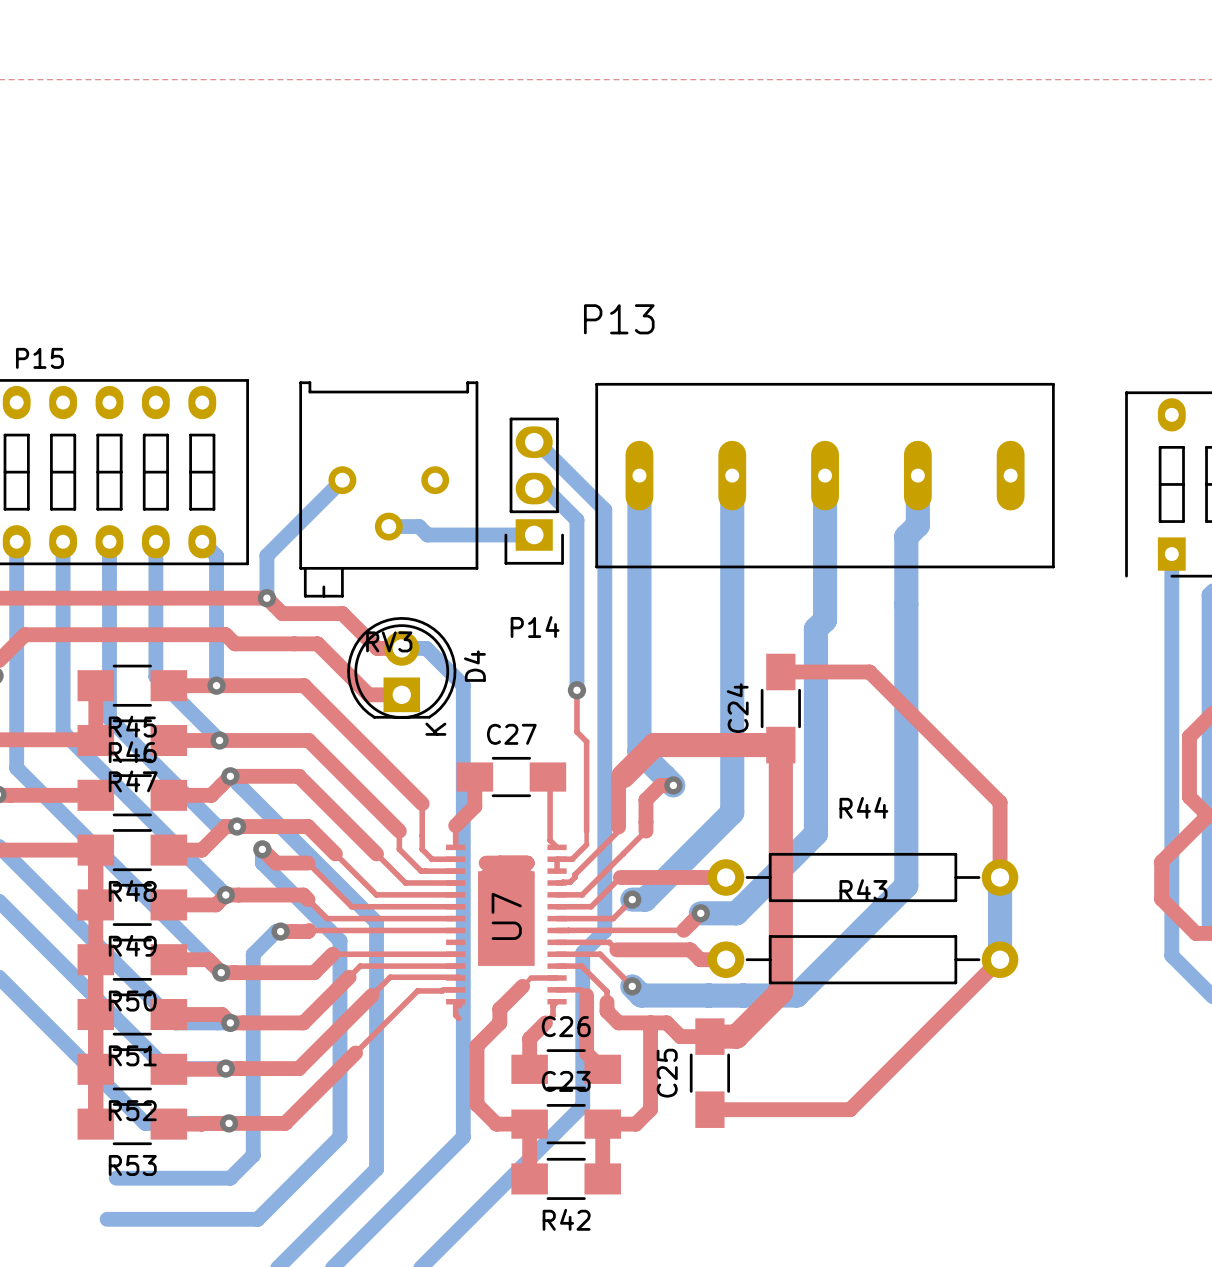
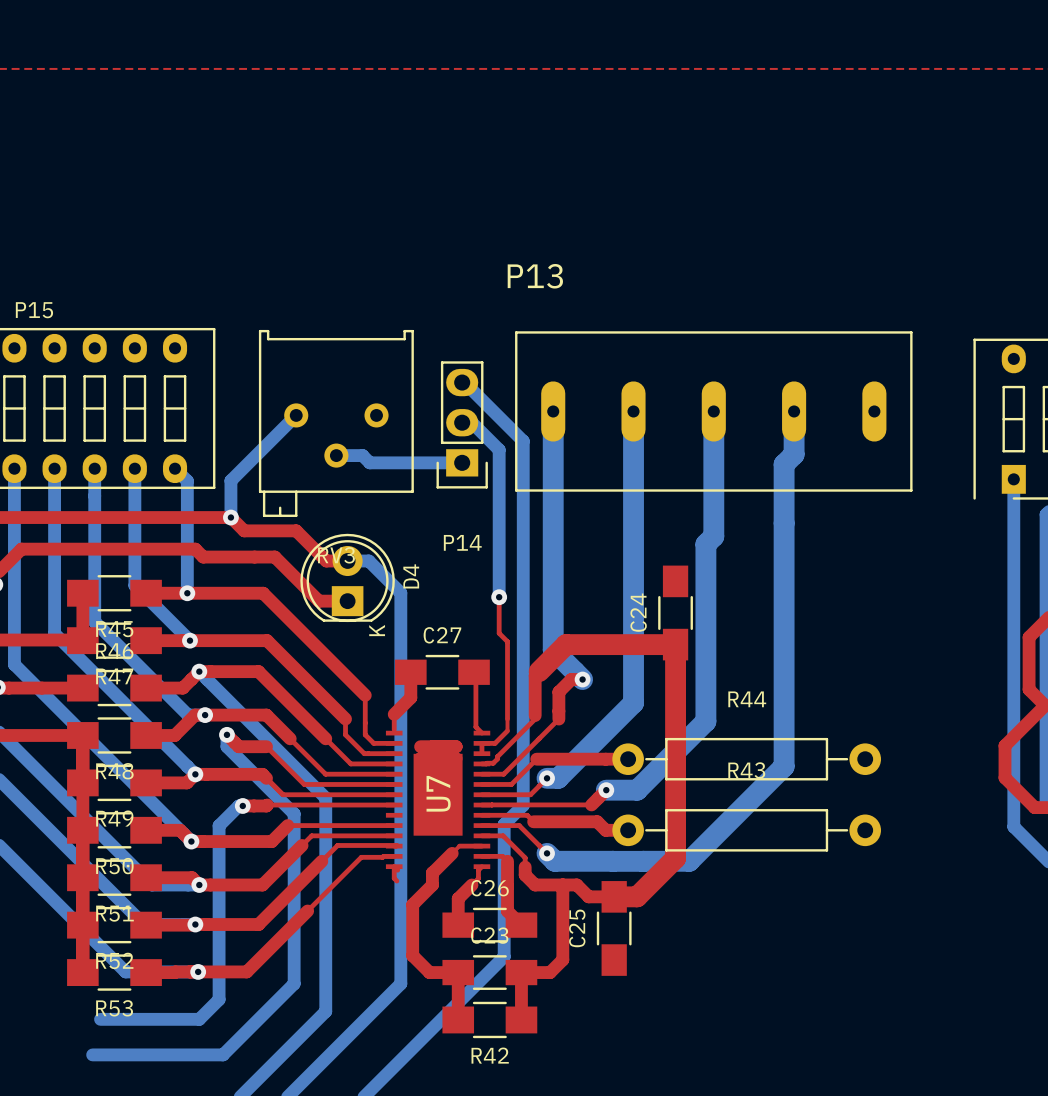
top track: (780, 671) (869, 671) (1000, 802) (1000, 877) -> none
bottom track: (1000, 877) (1000, 959) -> none
top track: (1000, 959) (850, 1109) (709, 1109) -> none

